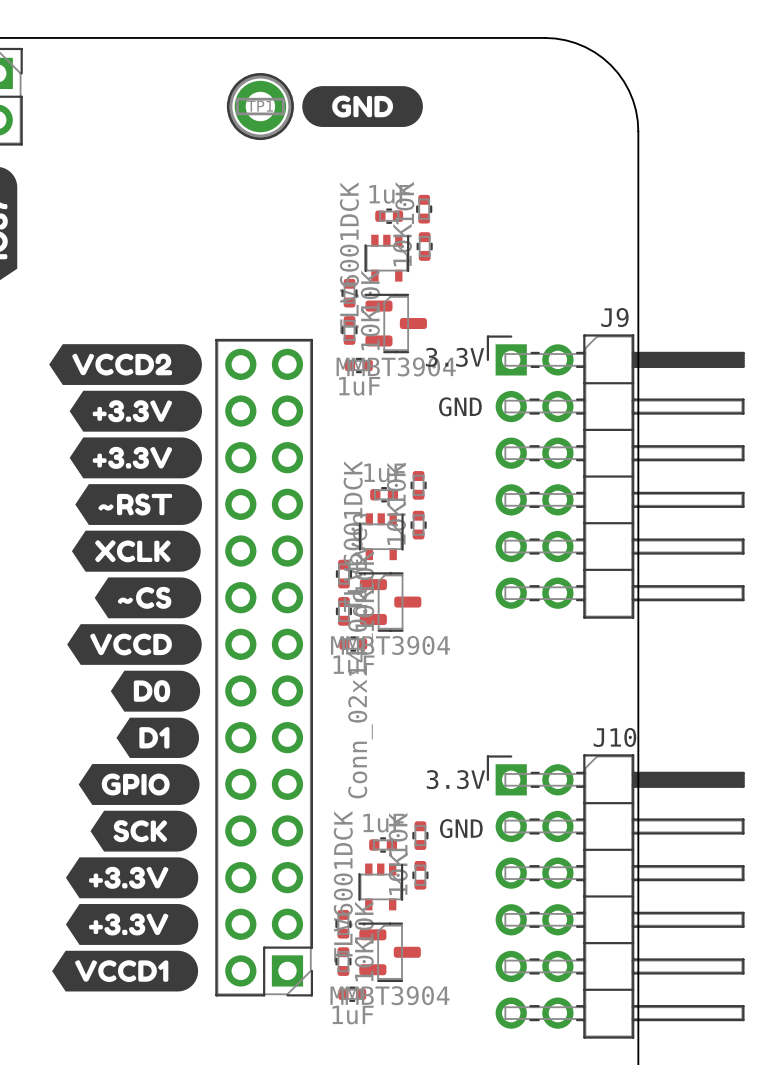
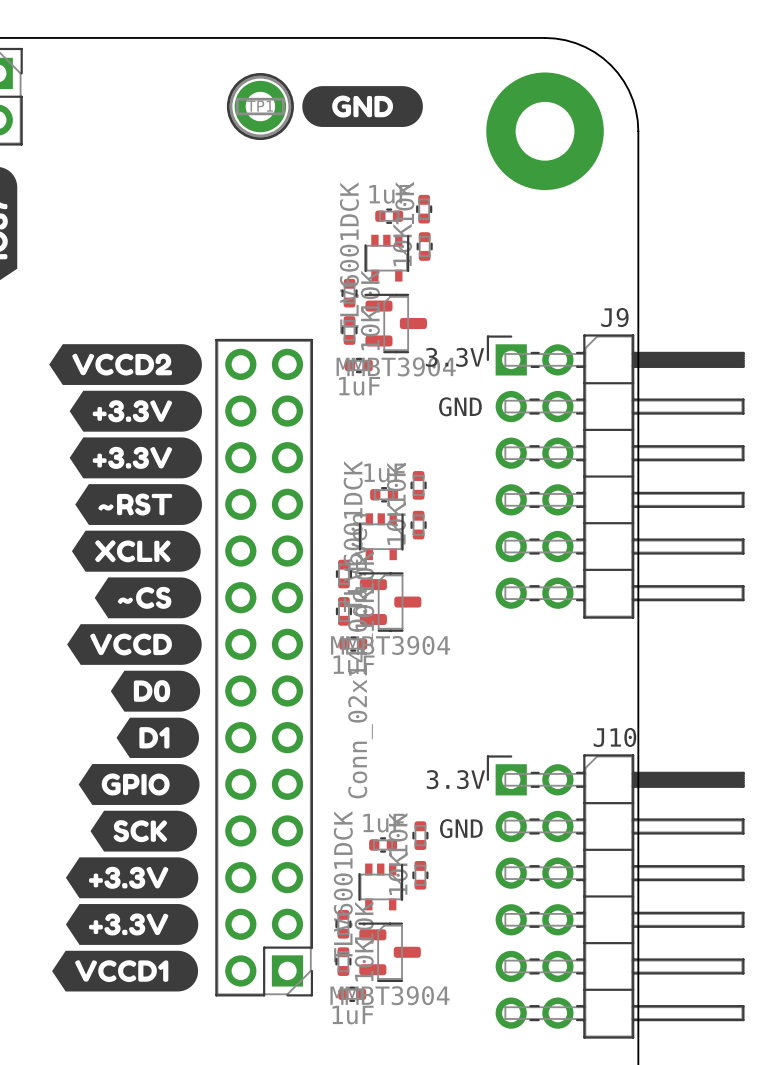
part: none -> (545, 131)

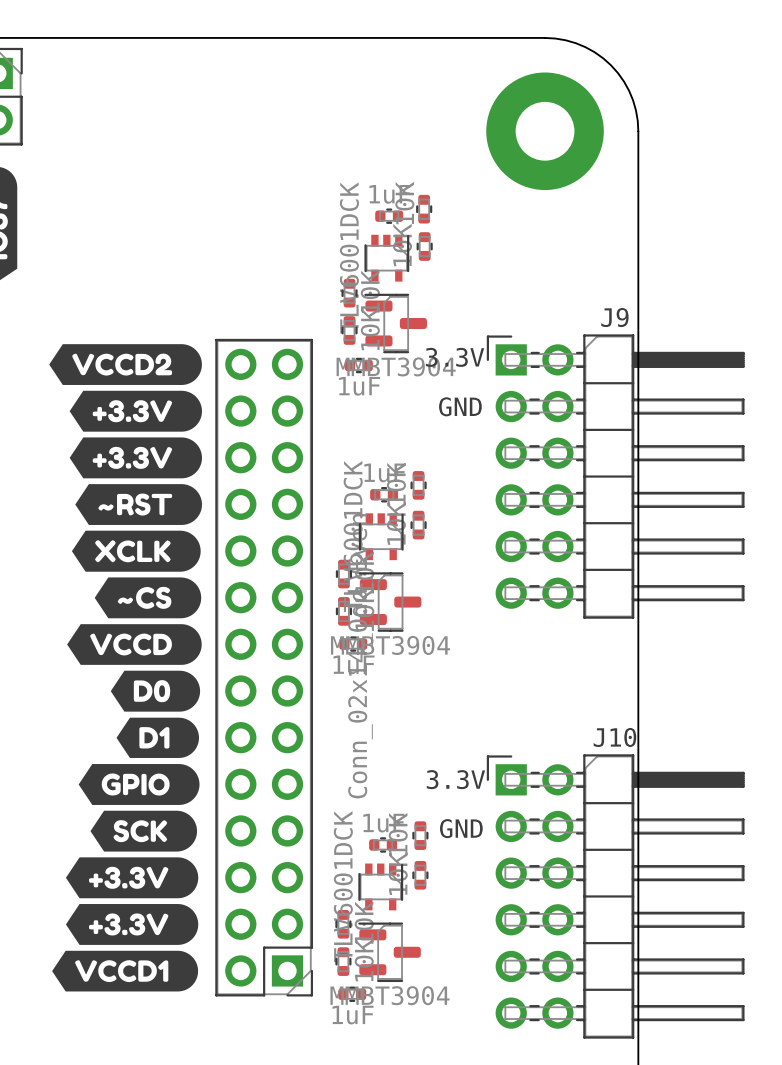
drawing: [302, 86, 423, 127] -> none
TP1: (260, 106) -> none

